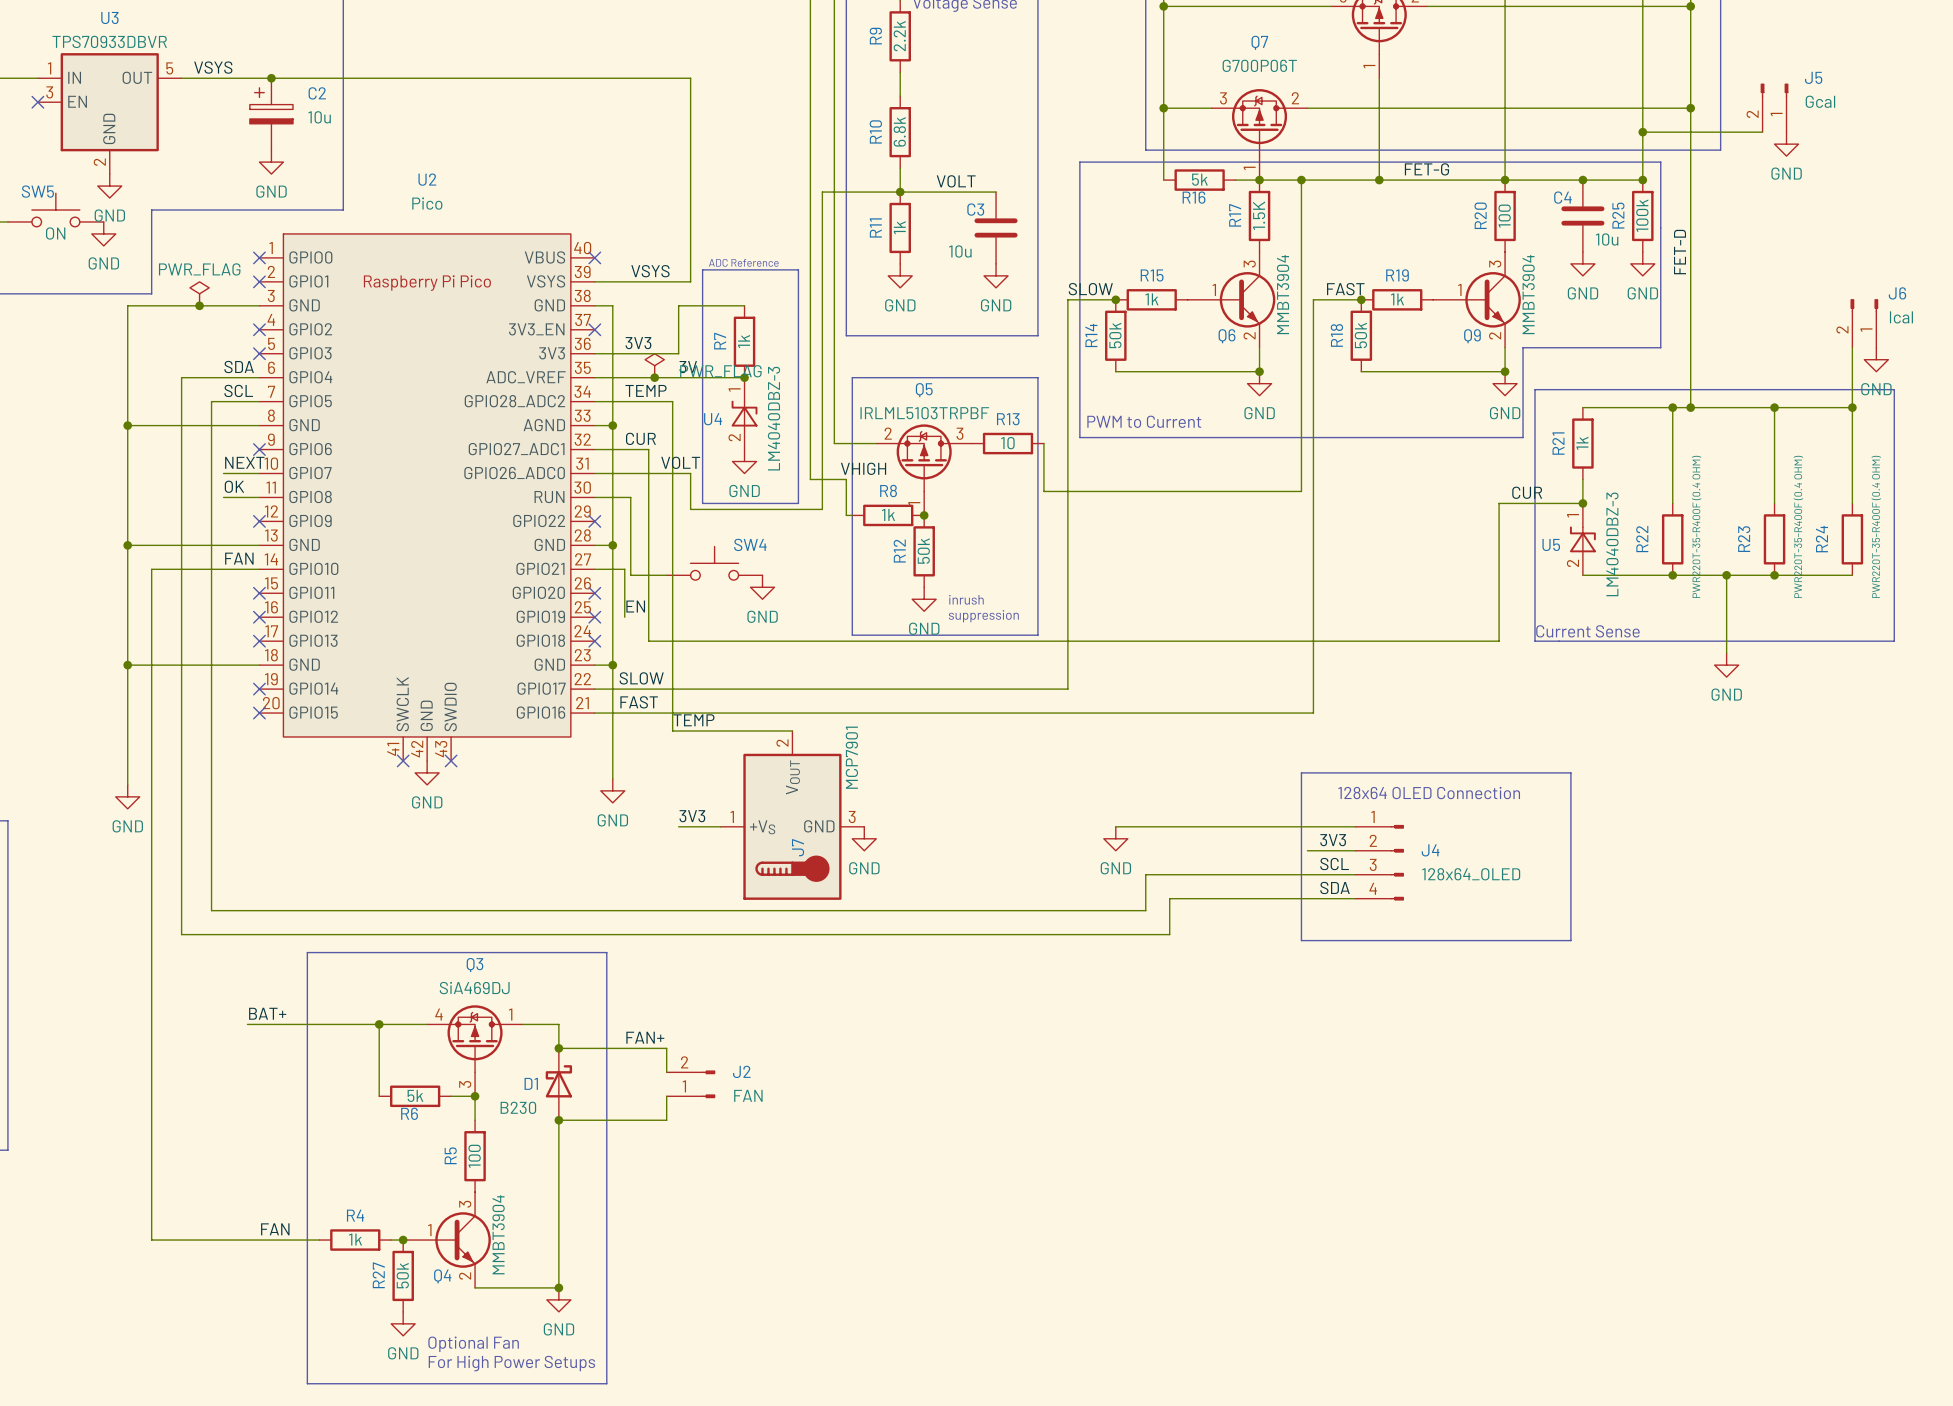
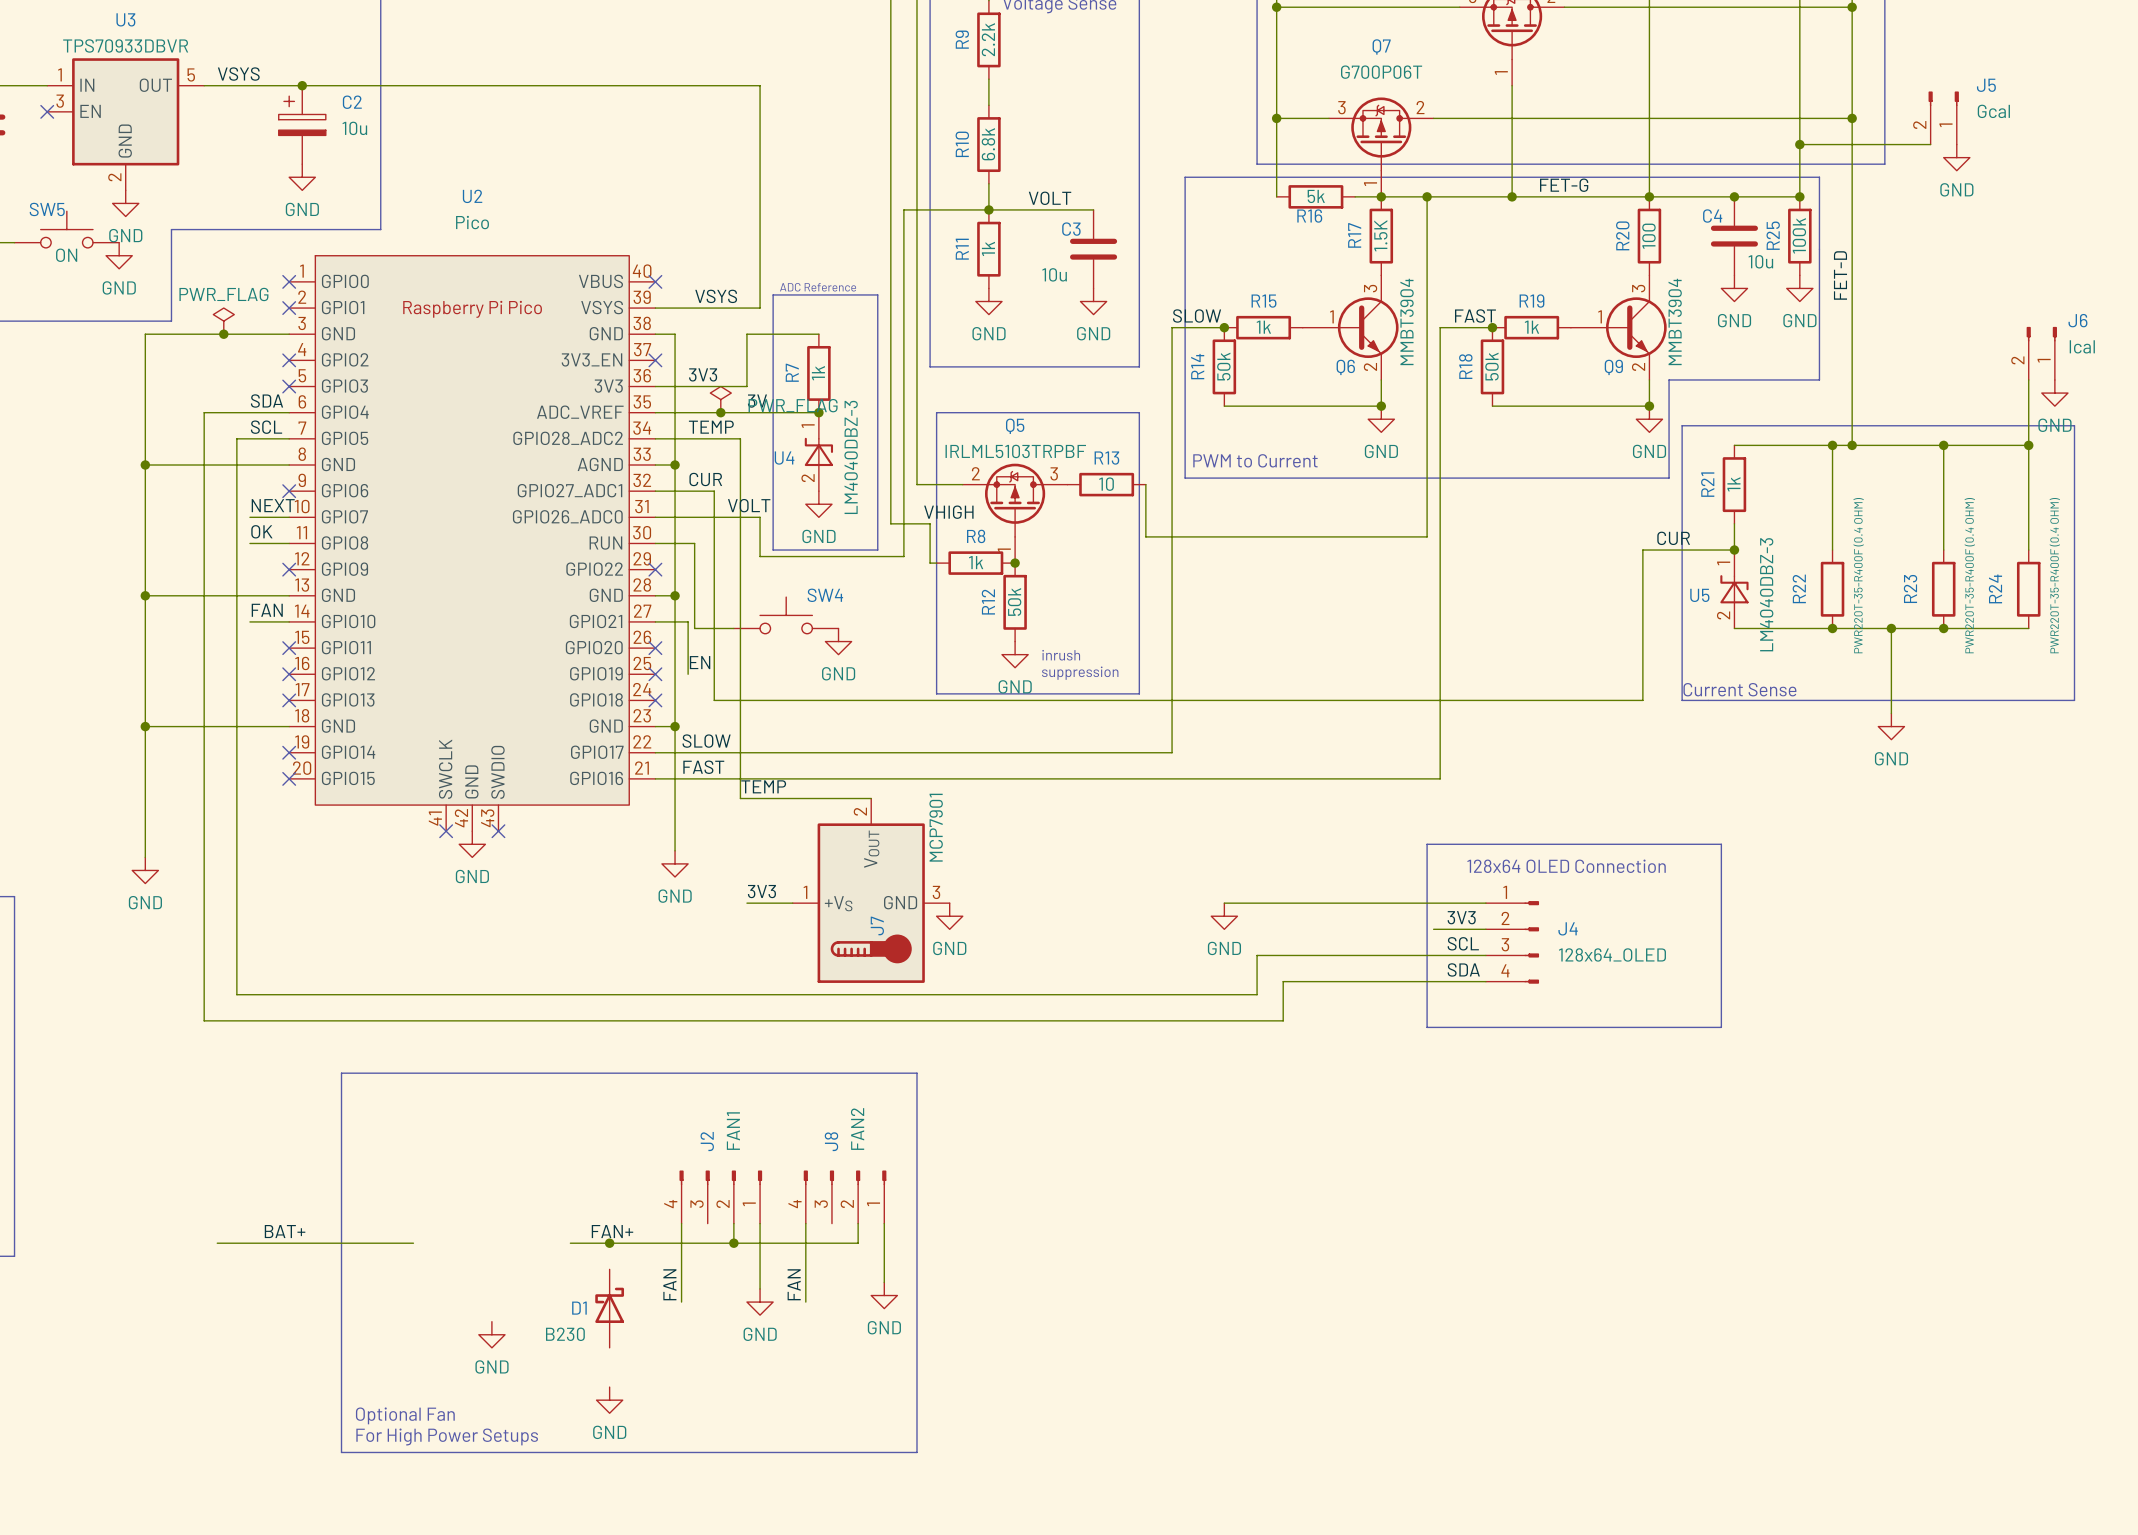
wire: (223, 569) (151, 569) (151, 1240) (319, 1240) -> none
line: (307, 982) (307, 952) (606, 952) (606, 1383) (307, 1383) (307, 1329) -> (341, 1073) (916, 1073) (916, 1452) (341, 1452)
label position: BAT+ (267, 1013) -> BAT+ (285, 1231)
wire: (247, 1024) (427, 1024) -> (217, 1243) (413, 1243)
wire: (379, 1024) (379, 1096) -> none
junction: (379, 1024) -> none
wire: (522, 1024) (558, 1024) (558, 1048) (666, 1048) (666, 1072) -> none
label position: FAN+ (645, 1037) -> FAN+ (612, 1231)
junction: (558, 1048) -> none
Q3: SiA469DJ (475, 1050) -> none
J2 symbol: [666, 1070, 716, 1099] -> [679, 1170, 763, 1224]
J2 name position: J2 (741, 1071) -> J2 (707, 1141)
D1 position: (558, 1084) -> (609, 1308)
J2 value: FAN (748, 1095) -> FAN1 (733, 1131)
J8: none -> FAN2 (845, 1197)
R6: 5k (415, 1096) -> none
wire: (451, 1096) (475, 1096) (475, 1120) -> none
junction: (475, 1096) -> none
wire: (666, 1096) (666, 1120) (558, 1120) (558, 1287) (475, 1287) -> none
junction position: (558, 1120) -> (609, 1243)
wire: none -> (681, 1223) (681, 1302)
wire: none -> (733, 1223) (733, 1243)
wire: none -> (760, 1223) (760, 1288)
wire: none -> (805, 1223) (805, 1302)
wire: none -> (858, 1223) (858, 1243) (570, 1243)
wire: none -> (884, 1223) (884, 1282)
junction: none -> (733, 1243)
R5: 100 (475, 1156) -> none
label: none -> FAN (669, 1284)
label: none -> FAN (794, 1284)
power symbol: none -> GND (884, 1295)
power symbol: none -> GND (760, 1302)
power symbol: none -> GND (491, 1334)
label: FAN (275, 1229) -> none
R4: 1k (355, 1240) -> none
wire: (391, 1240) (403, 1240) -> none
junction: (403, 1240) -> none
Q4: MMBT3904 (447, 1240) -> none
R27: 50k (403, 1275) -> none
junction: (558, 1287) -> none
power symbol position: GND (558, 1299) -> GND (609, 1400)
power symbol: GND (403, 1323) -> none
text position: Optional Fan (473, 1344) -> Optional Fan (405, 1415)
text position: For High Power Setups (511, 1363) -> For High Power Setups (447, 1436)

